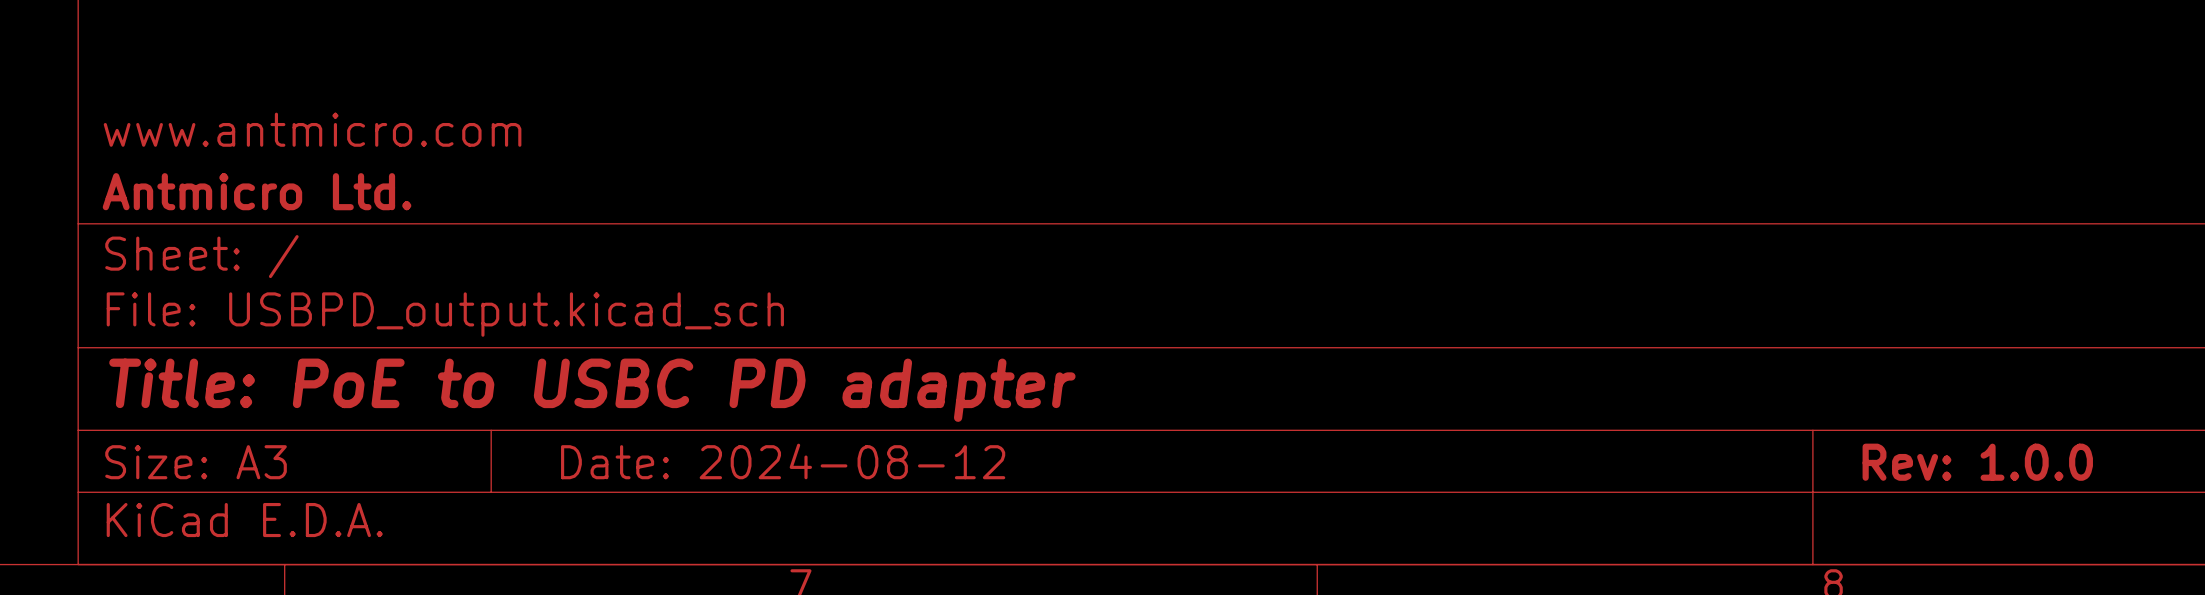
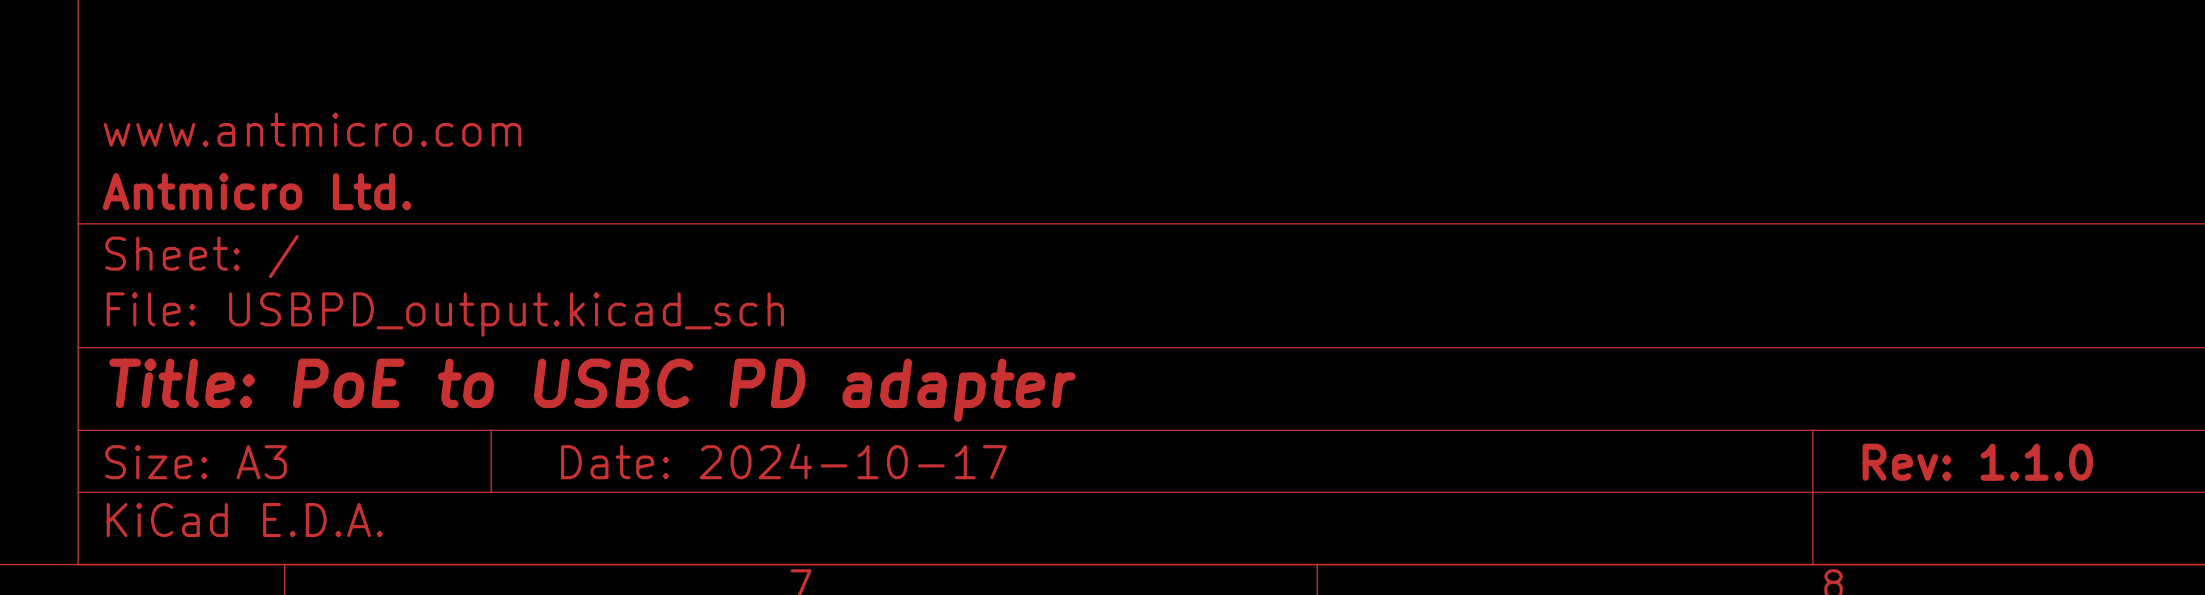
title block: Date: 2024-08-12 (783, 461) -> Date: 2024-10-17 (783, 461)
title block: Rev: 1.0.0 (1977, 462) -> Rev: 1.1.0 (1977, 462)

